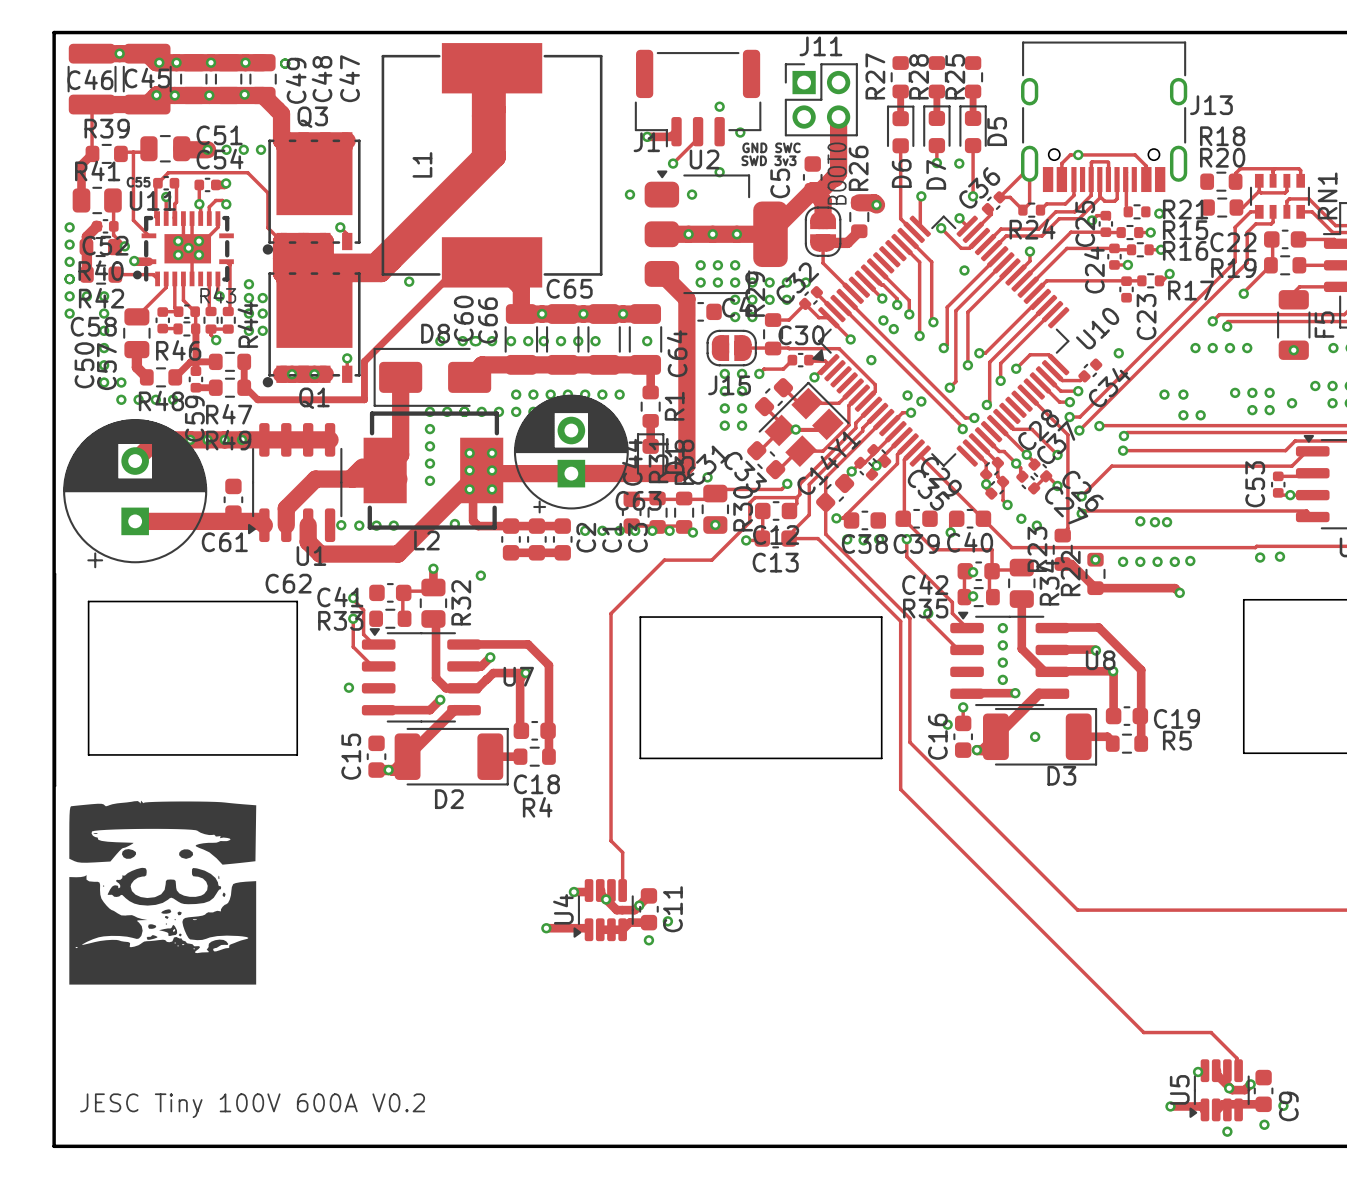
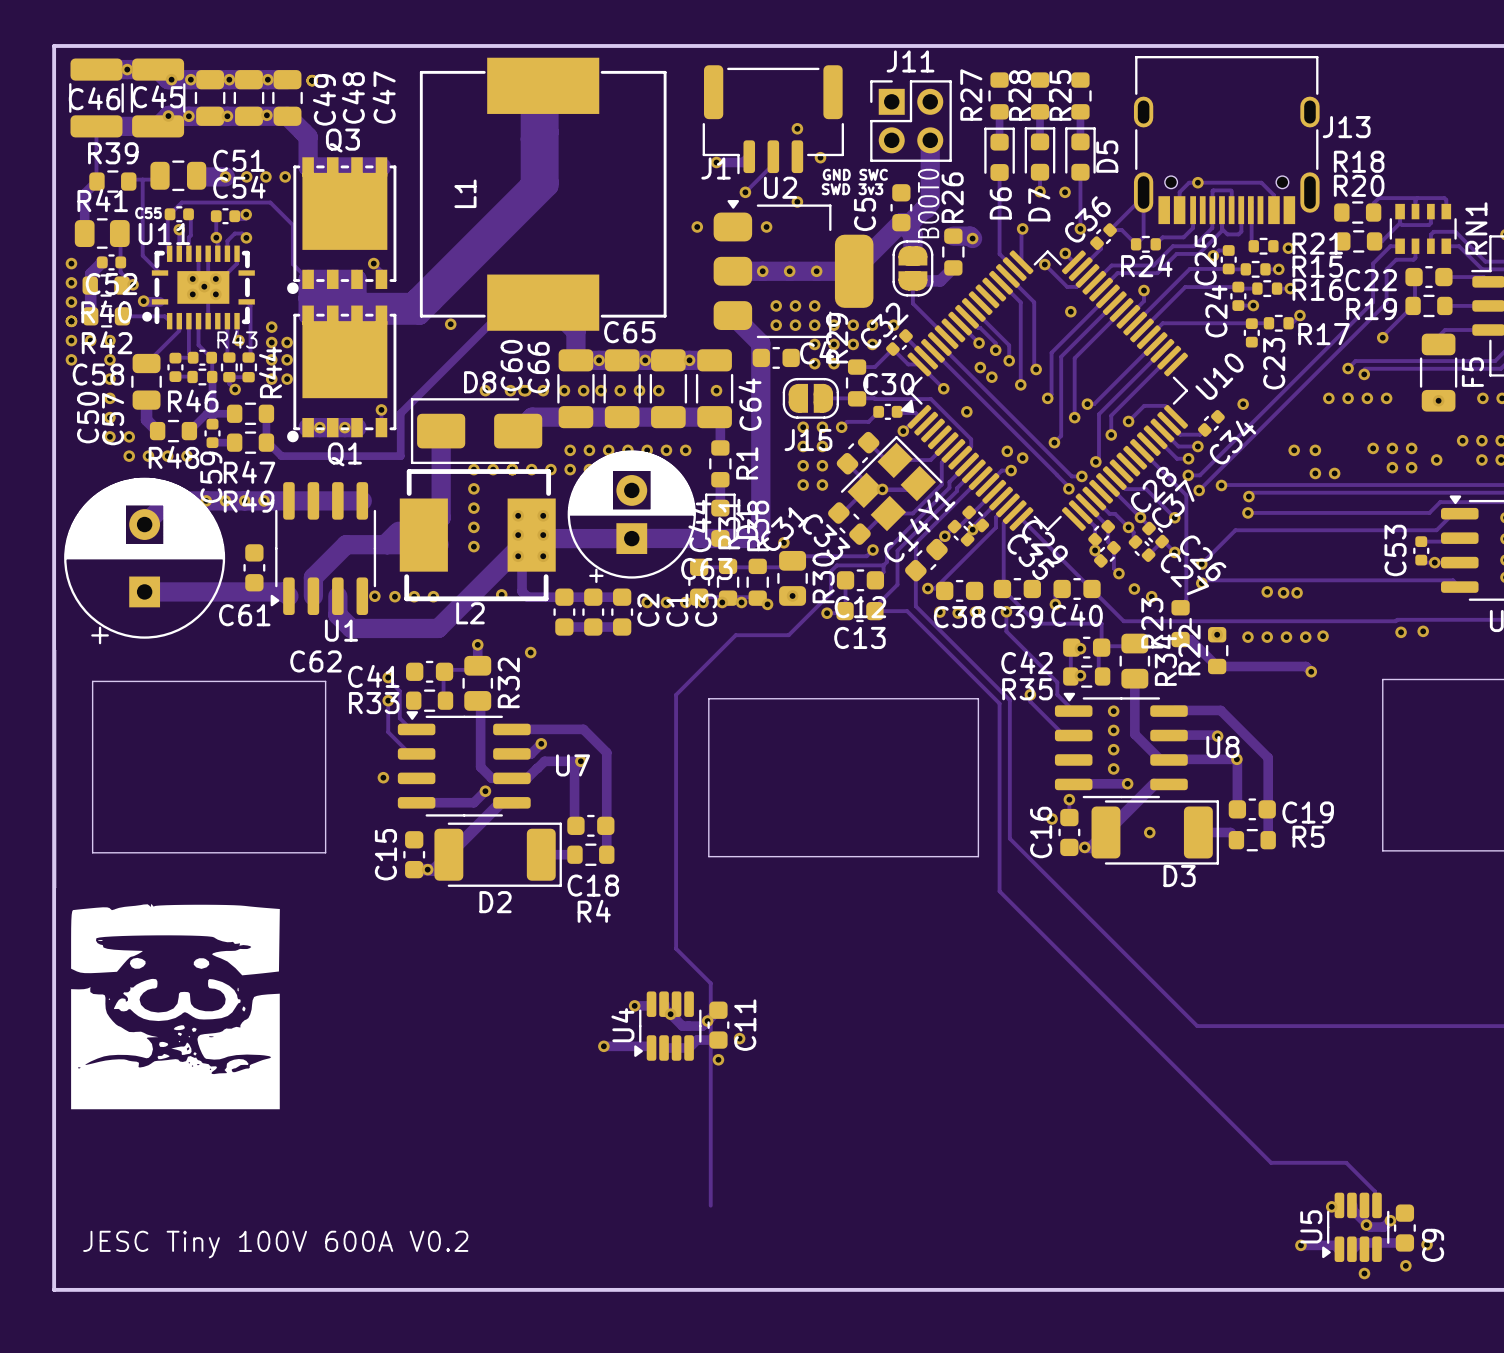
track: (622, 852) (622, 890) -> (689, 961) (710, 983) (710, 1205)

